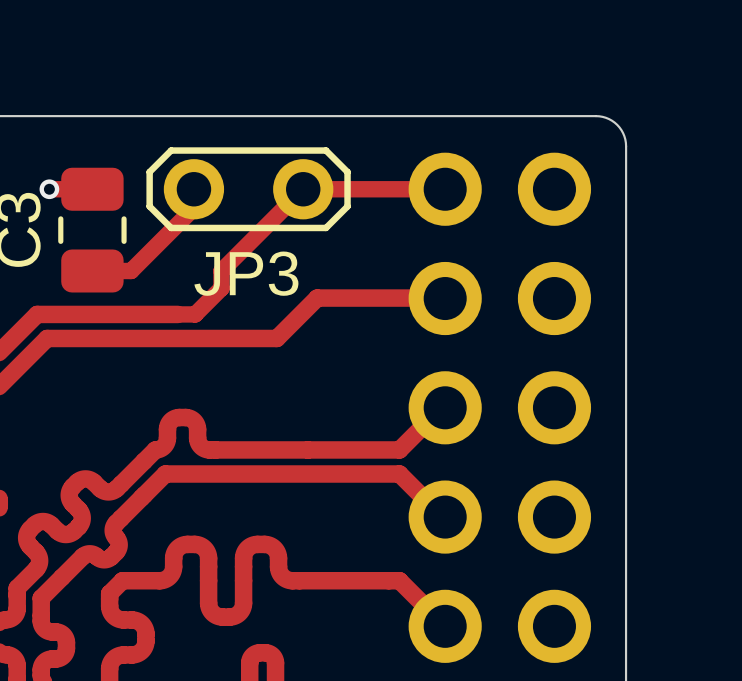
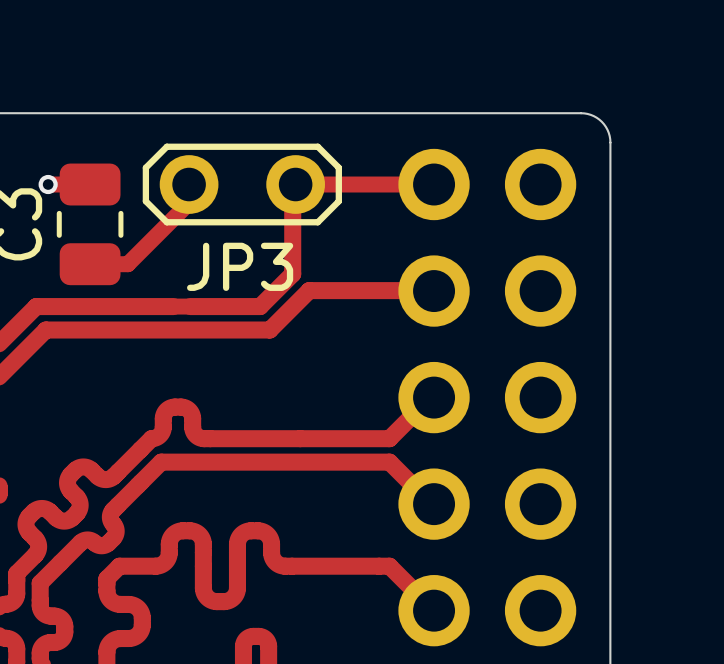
track: (303, 189) (221, 270) (221, 288) (195, 314) -> (292, 184) (292, 274) (260, 306) (190, 306)

